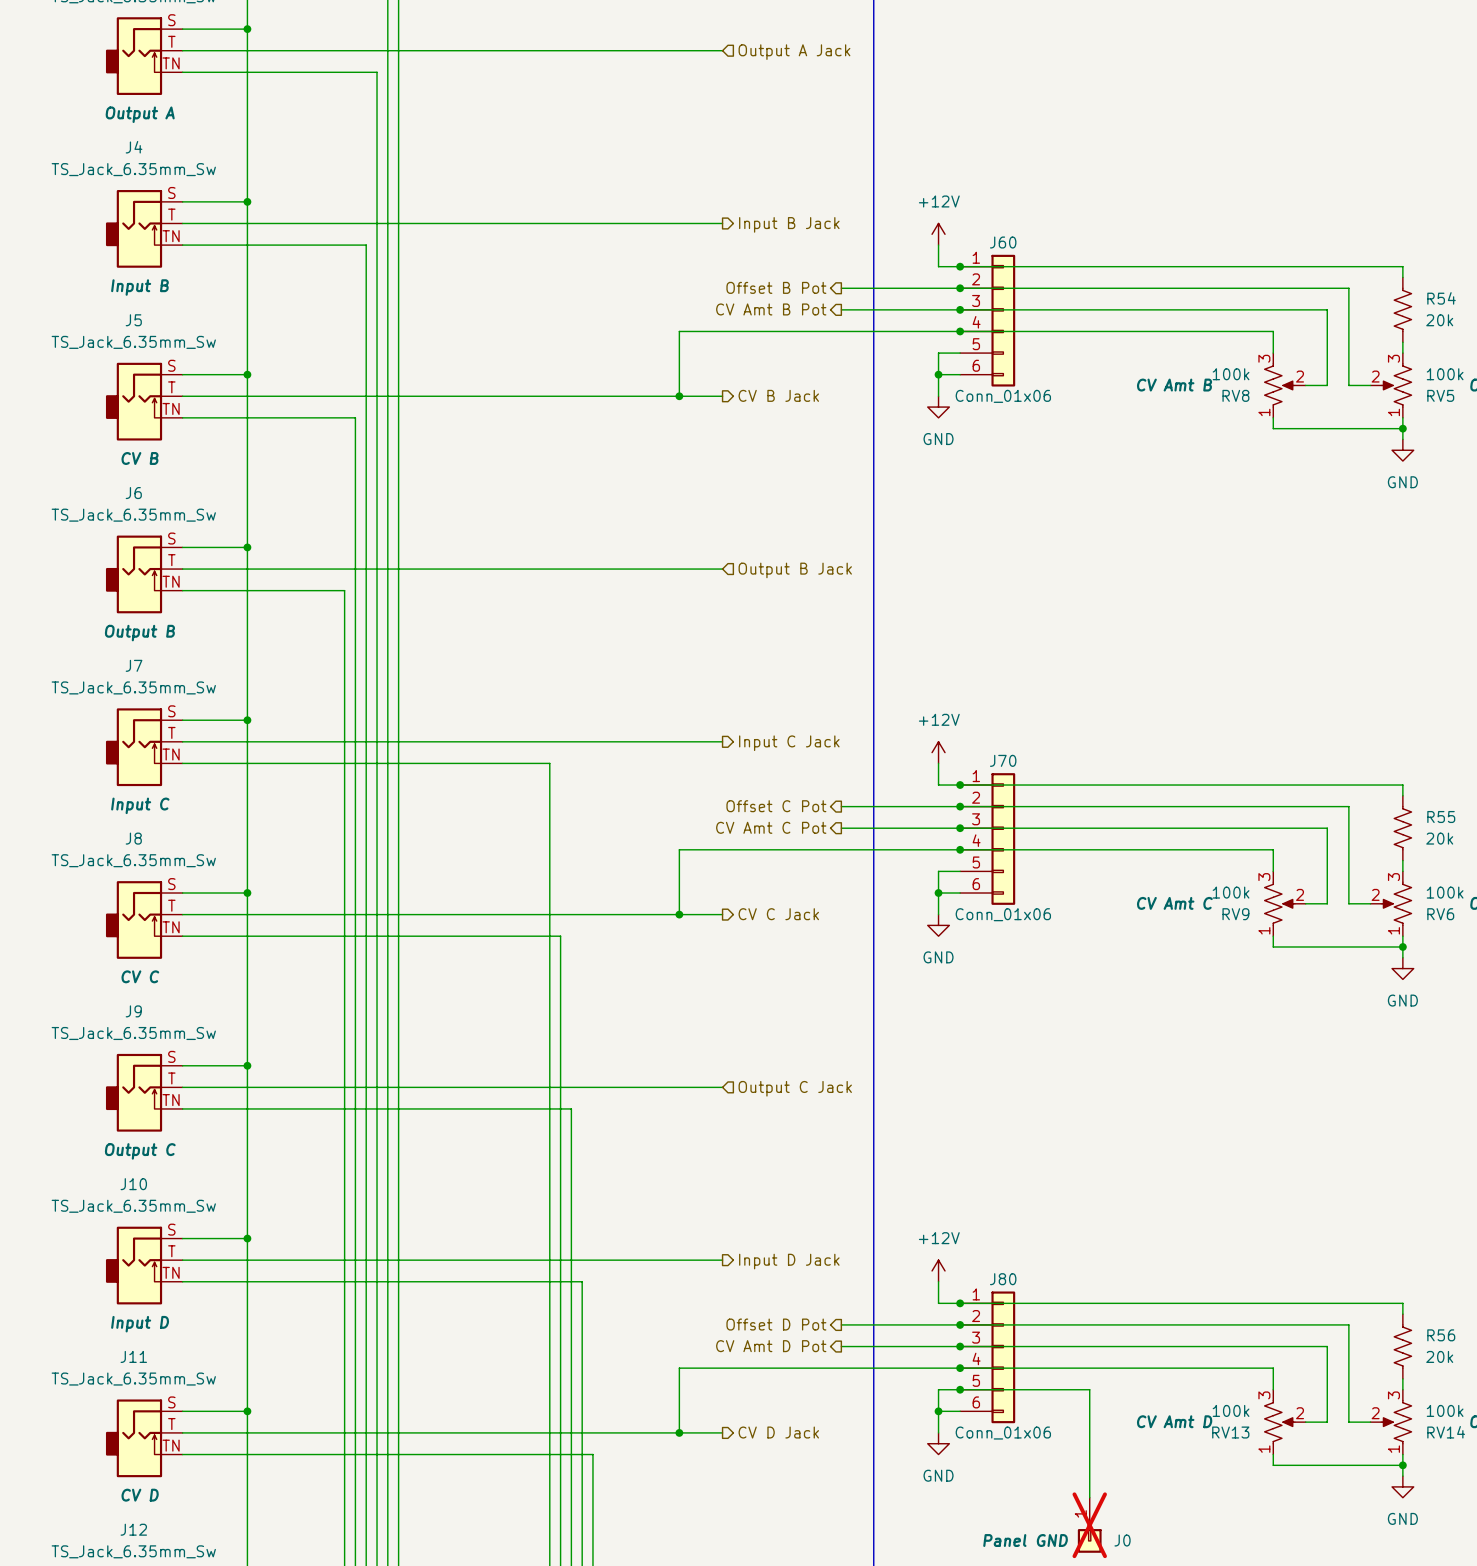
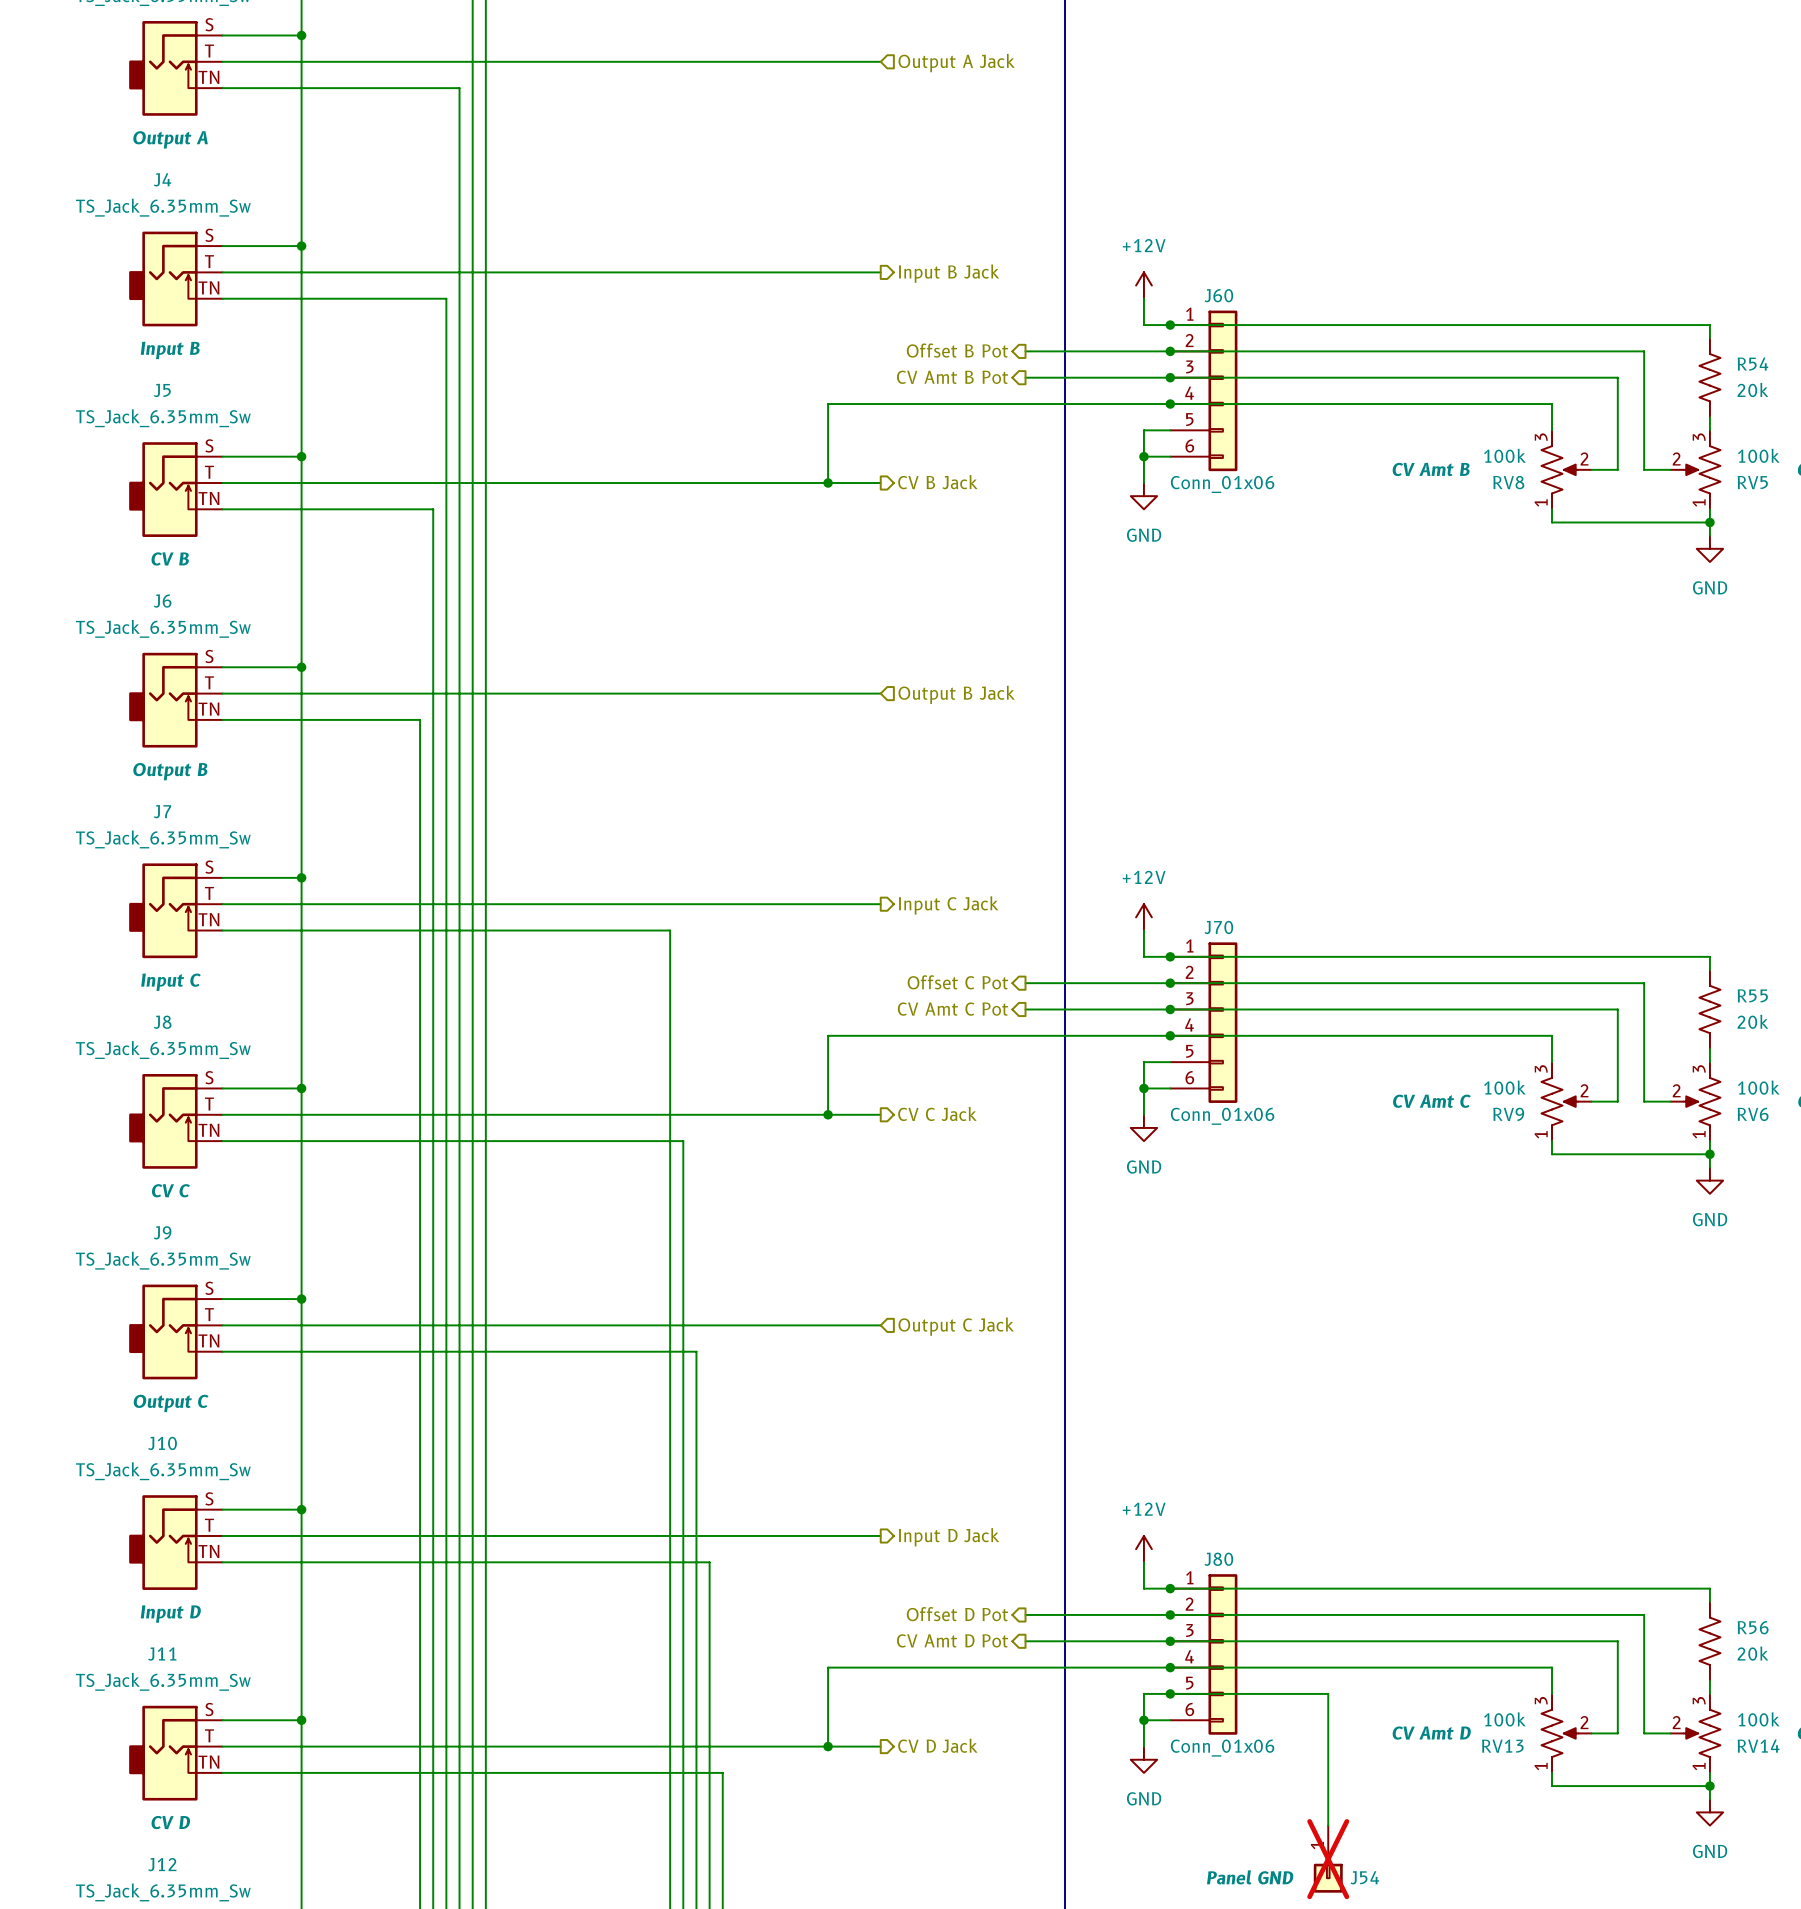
J0 name: J0 (1122, 1540) -> J54 (1364, 1877)

